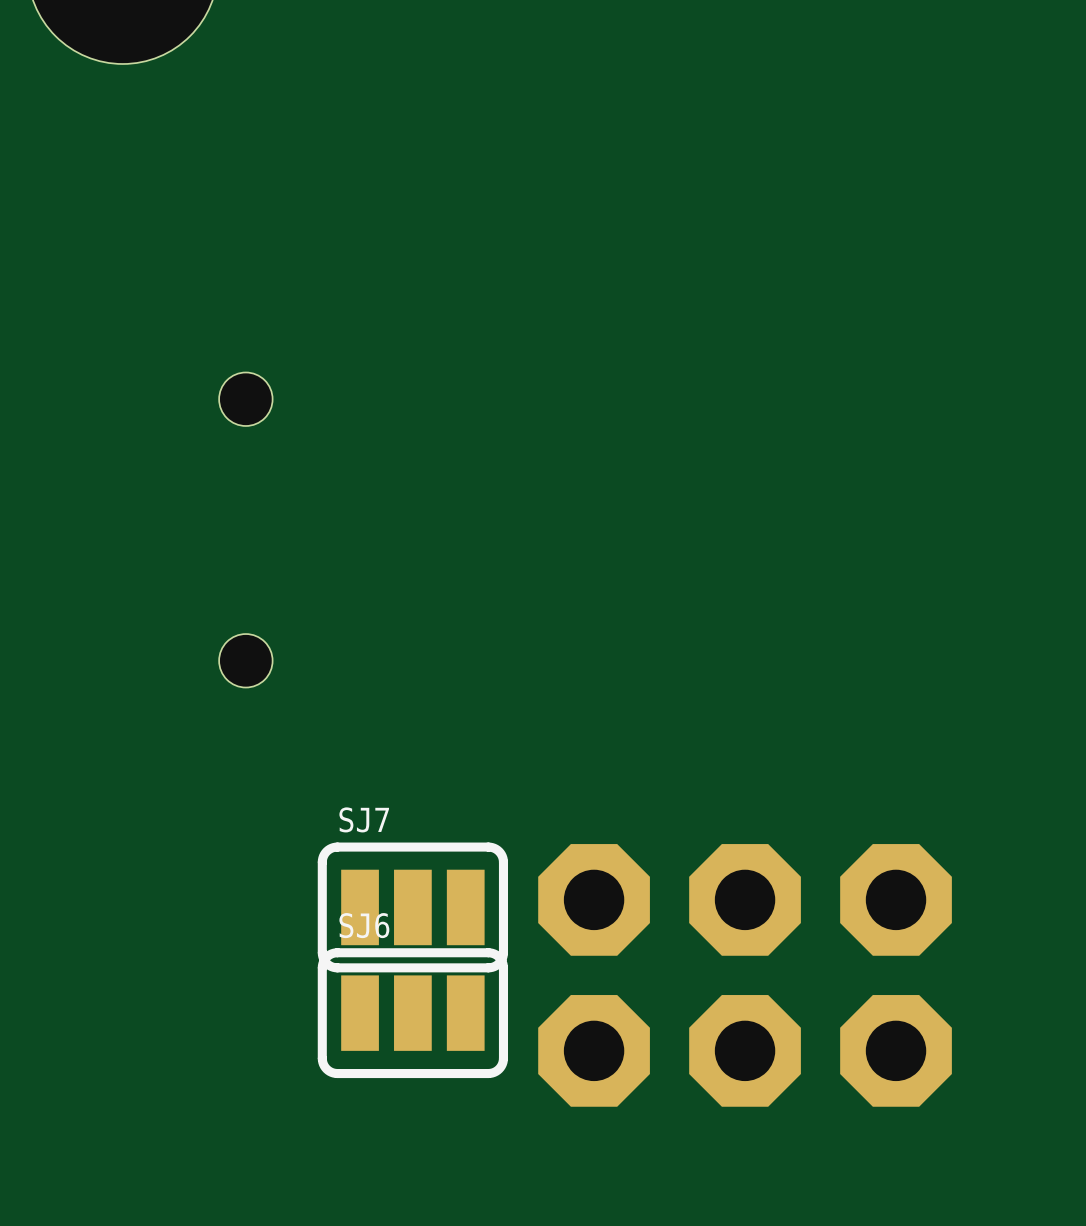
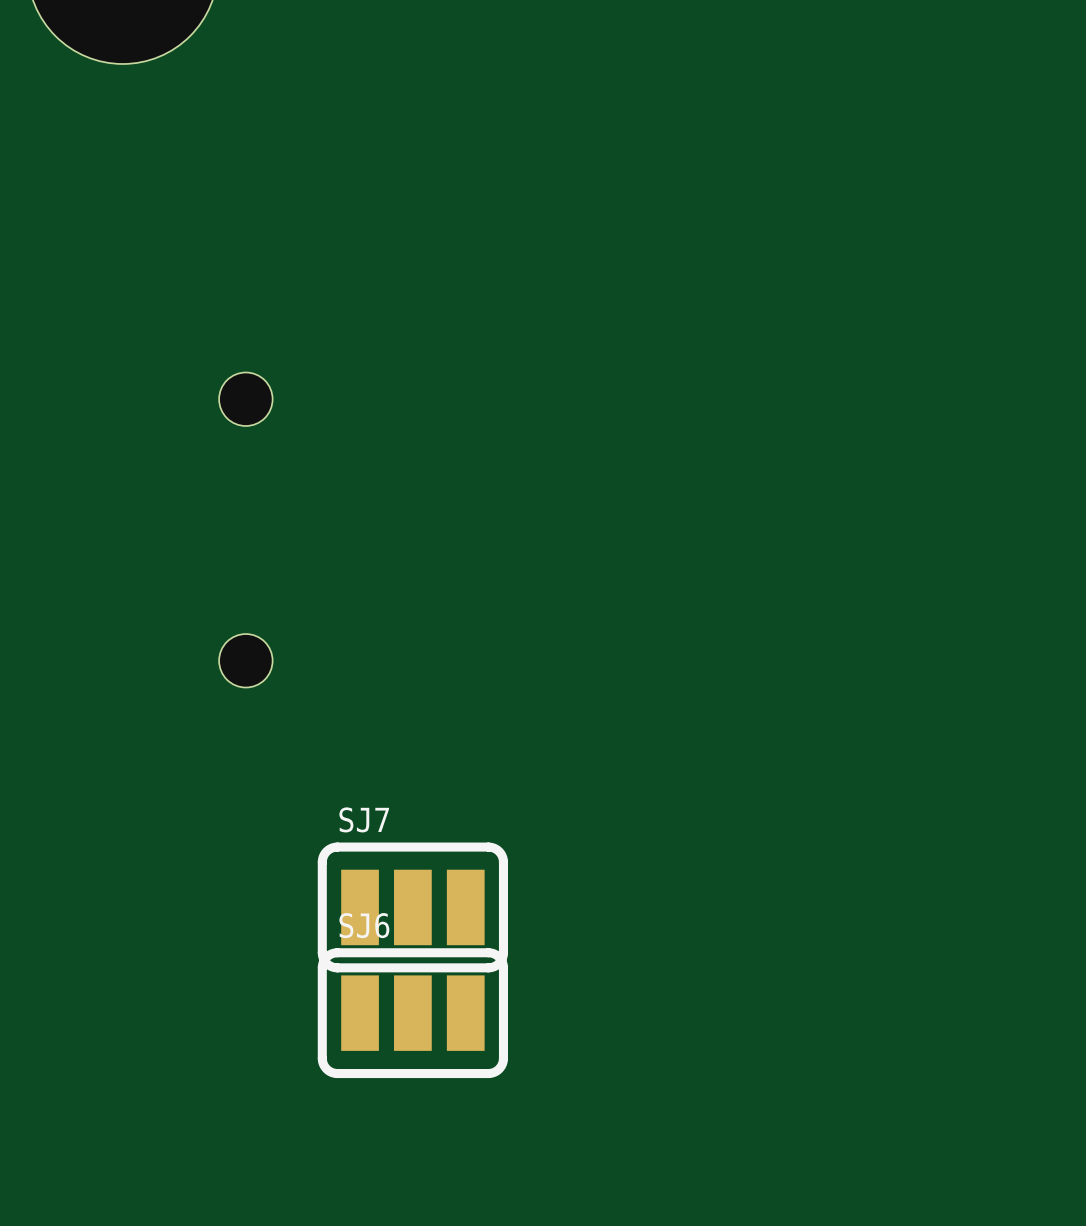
part: (745, 975) -> none

